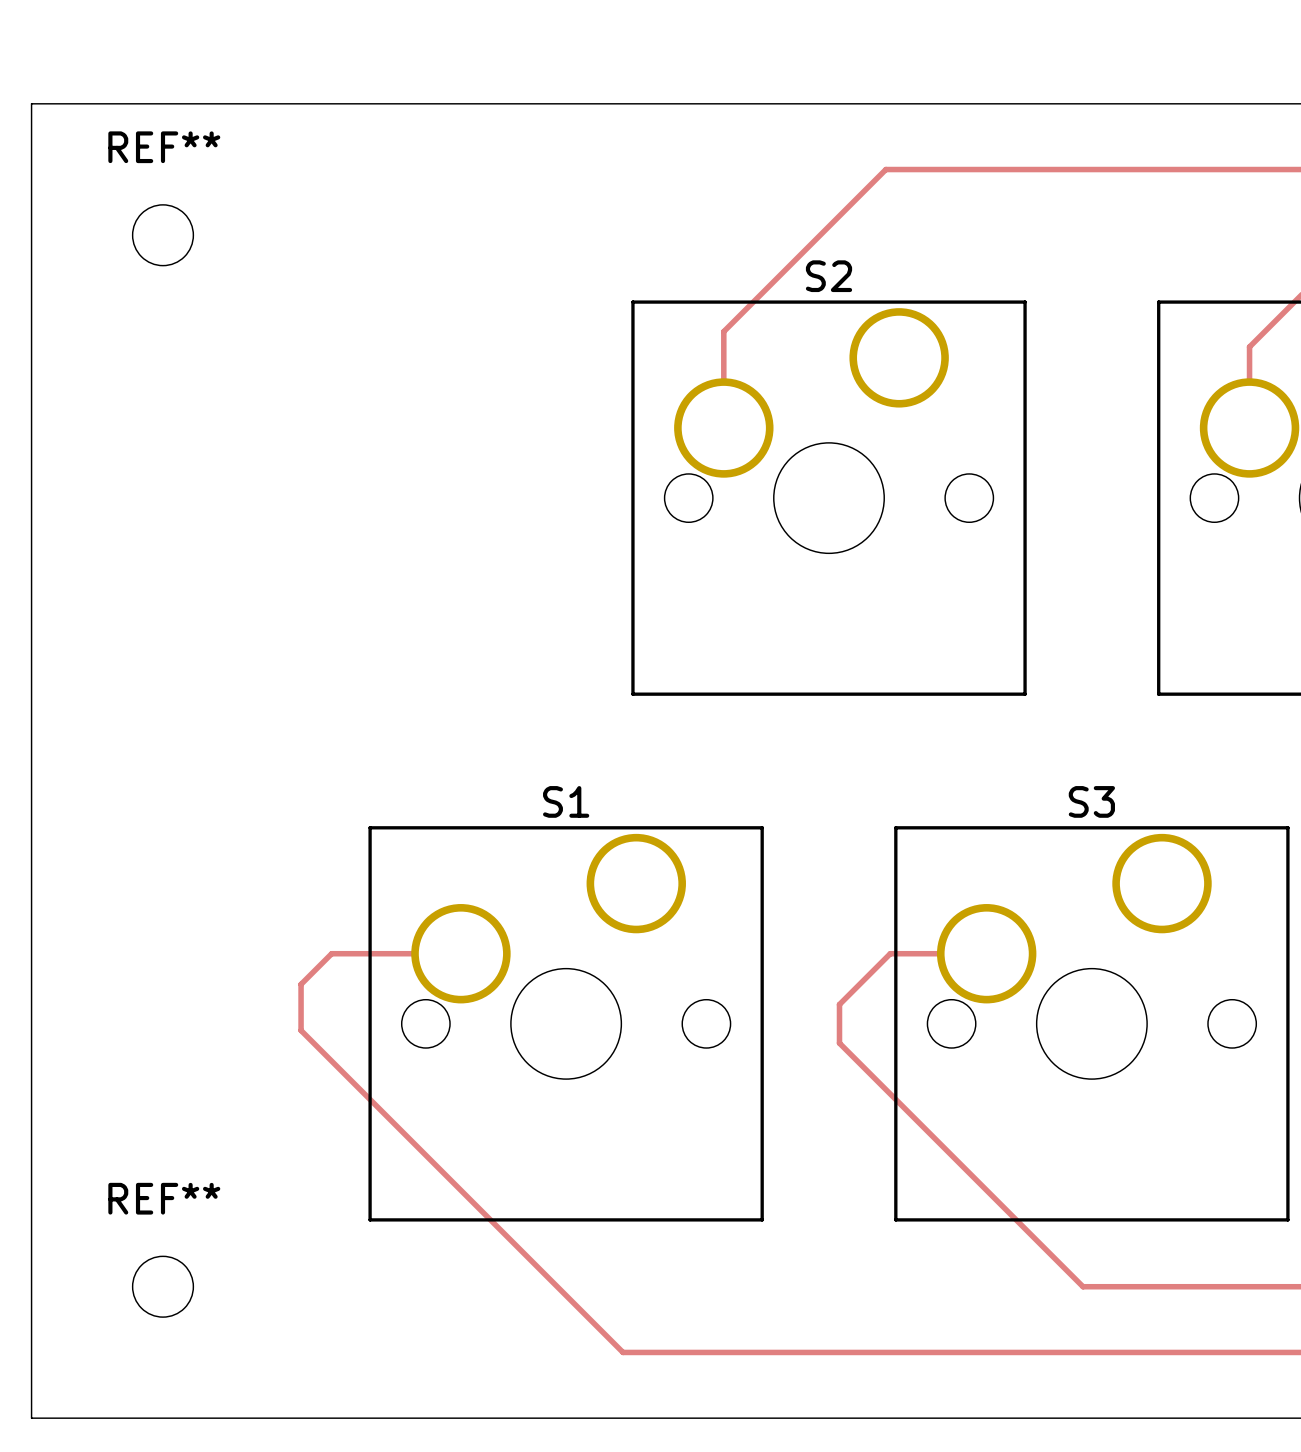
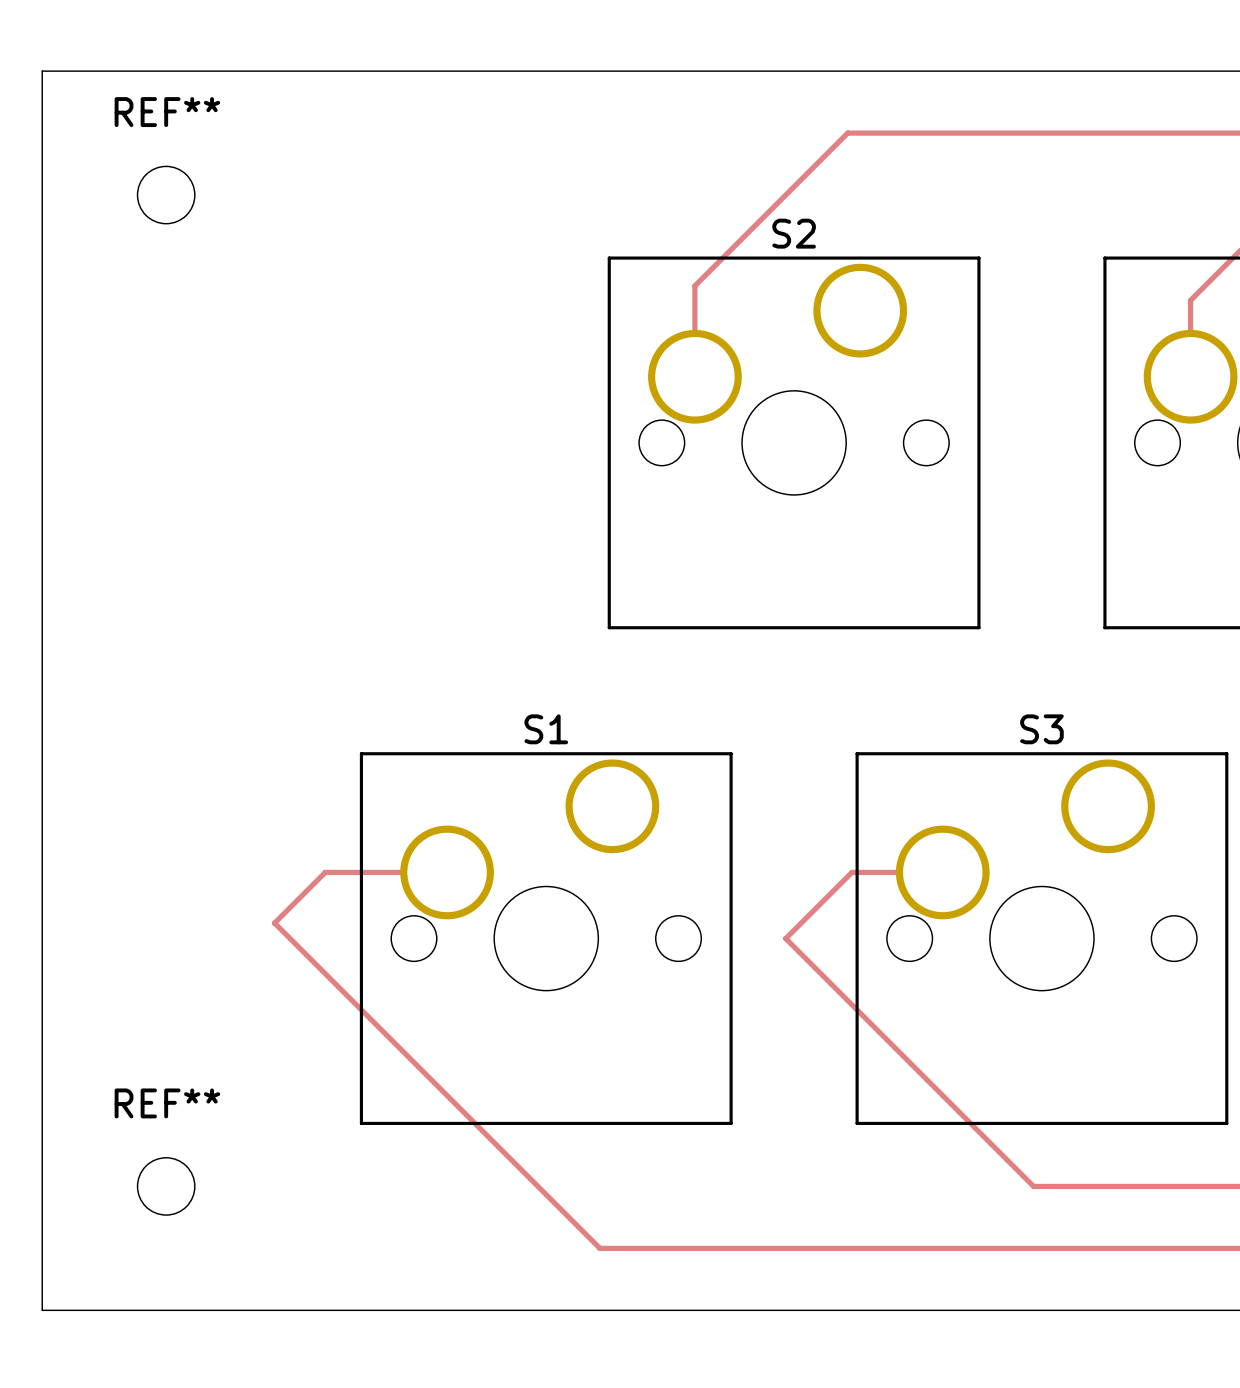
track: (301, 984) (301, 1030) -> (296, 901) (274, 923) (296, 944)
track: (839, 1004) (839, 1043) -> (804, 920) (785, 938) (804, 956)

